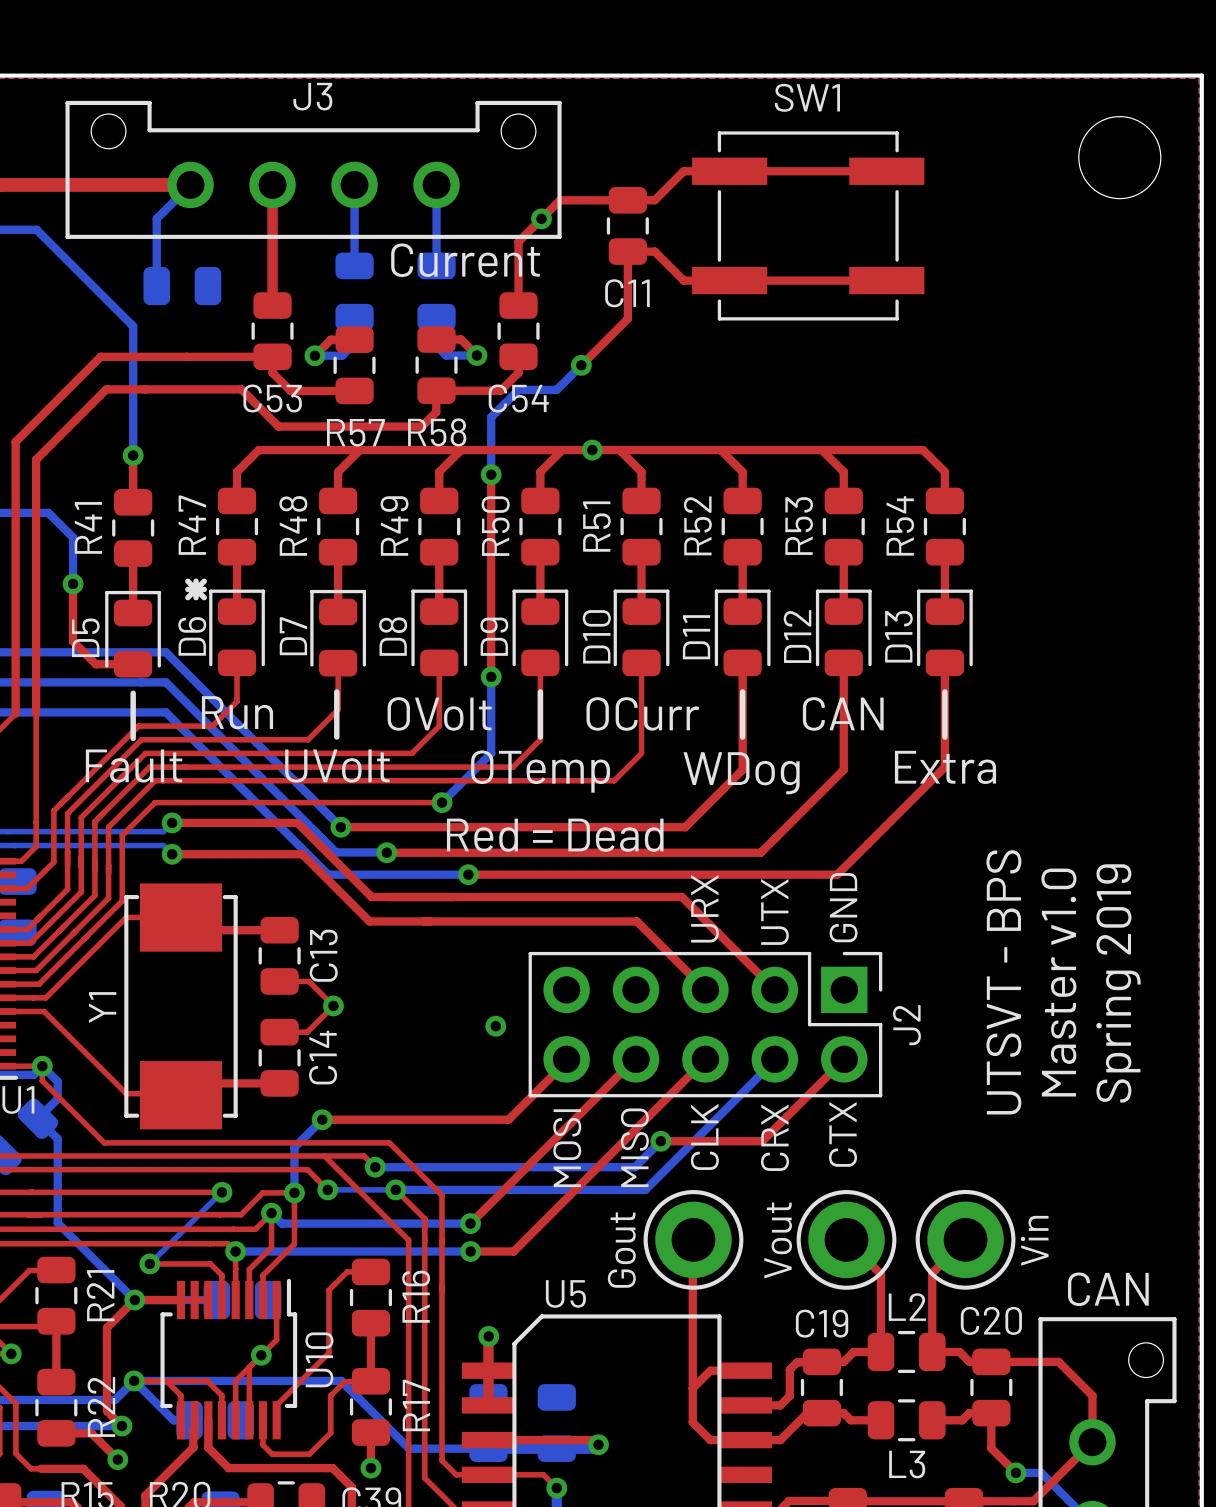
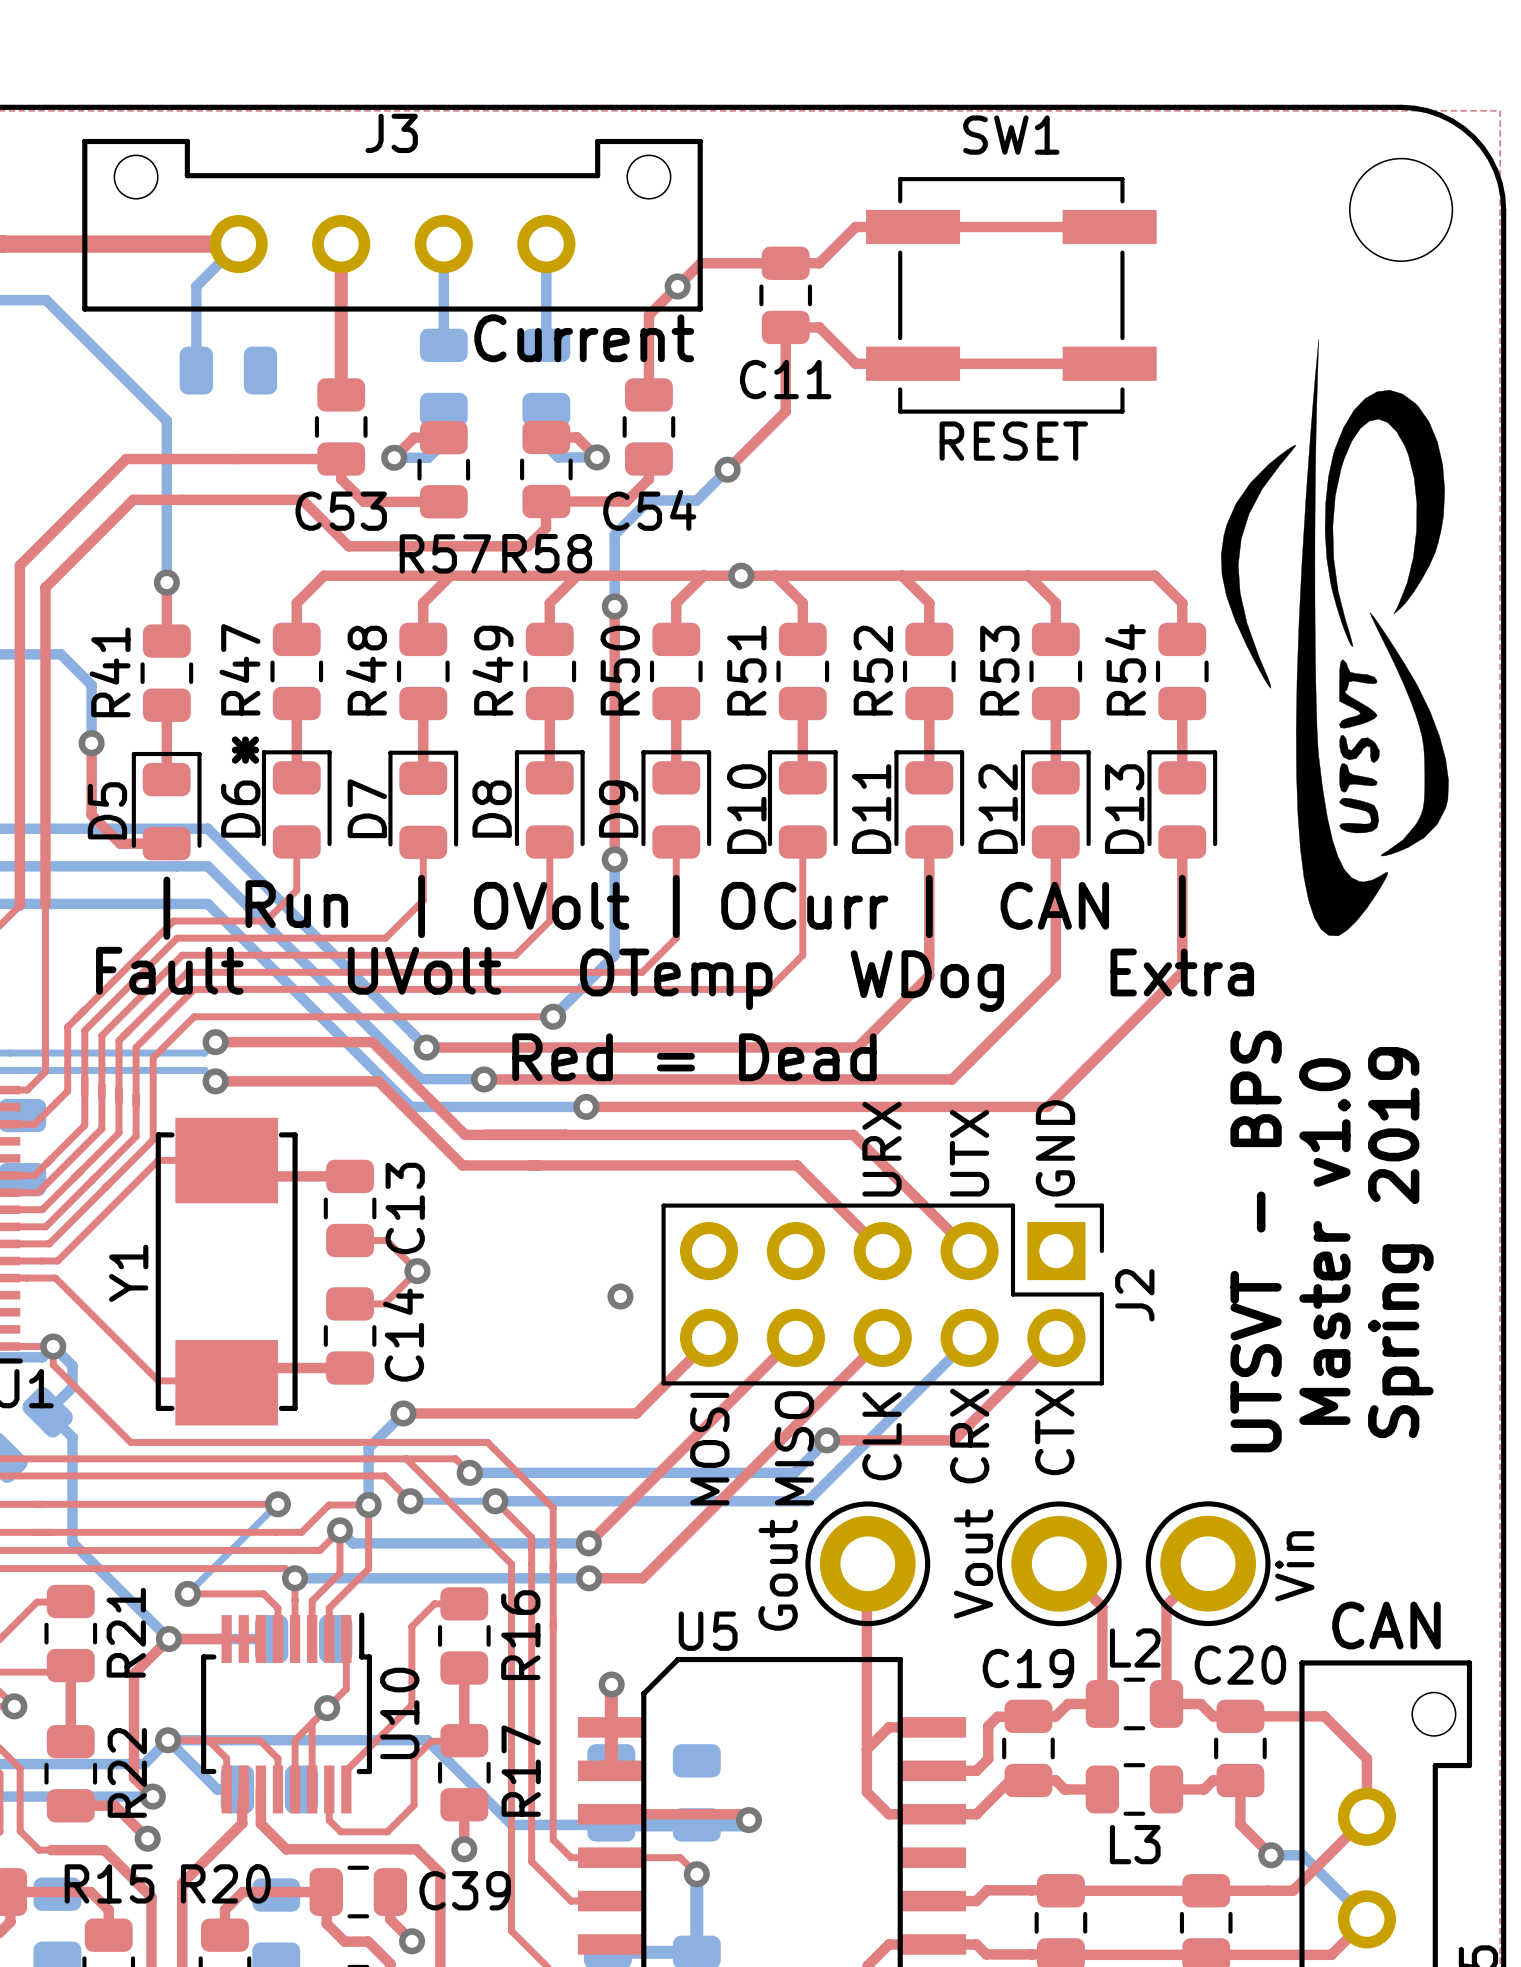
board edge: (1119, 75) (1201, 75) (1201, 157) -> (1401, 107) (1414, 108) (1440, 115) (1463, 128) (1473, 137) (1482, 147) (1495, 170) (1502, 196) (1503, 209)
drawing: none -> [1221, 339, 1449, 937]
text: none -> RESET (1013, 441)

